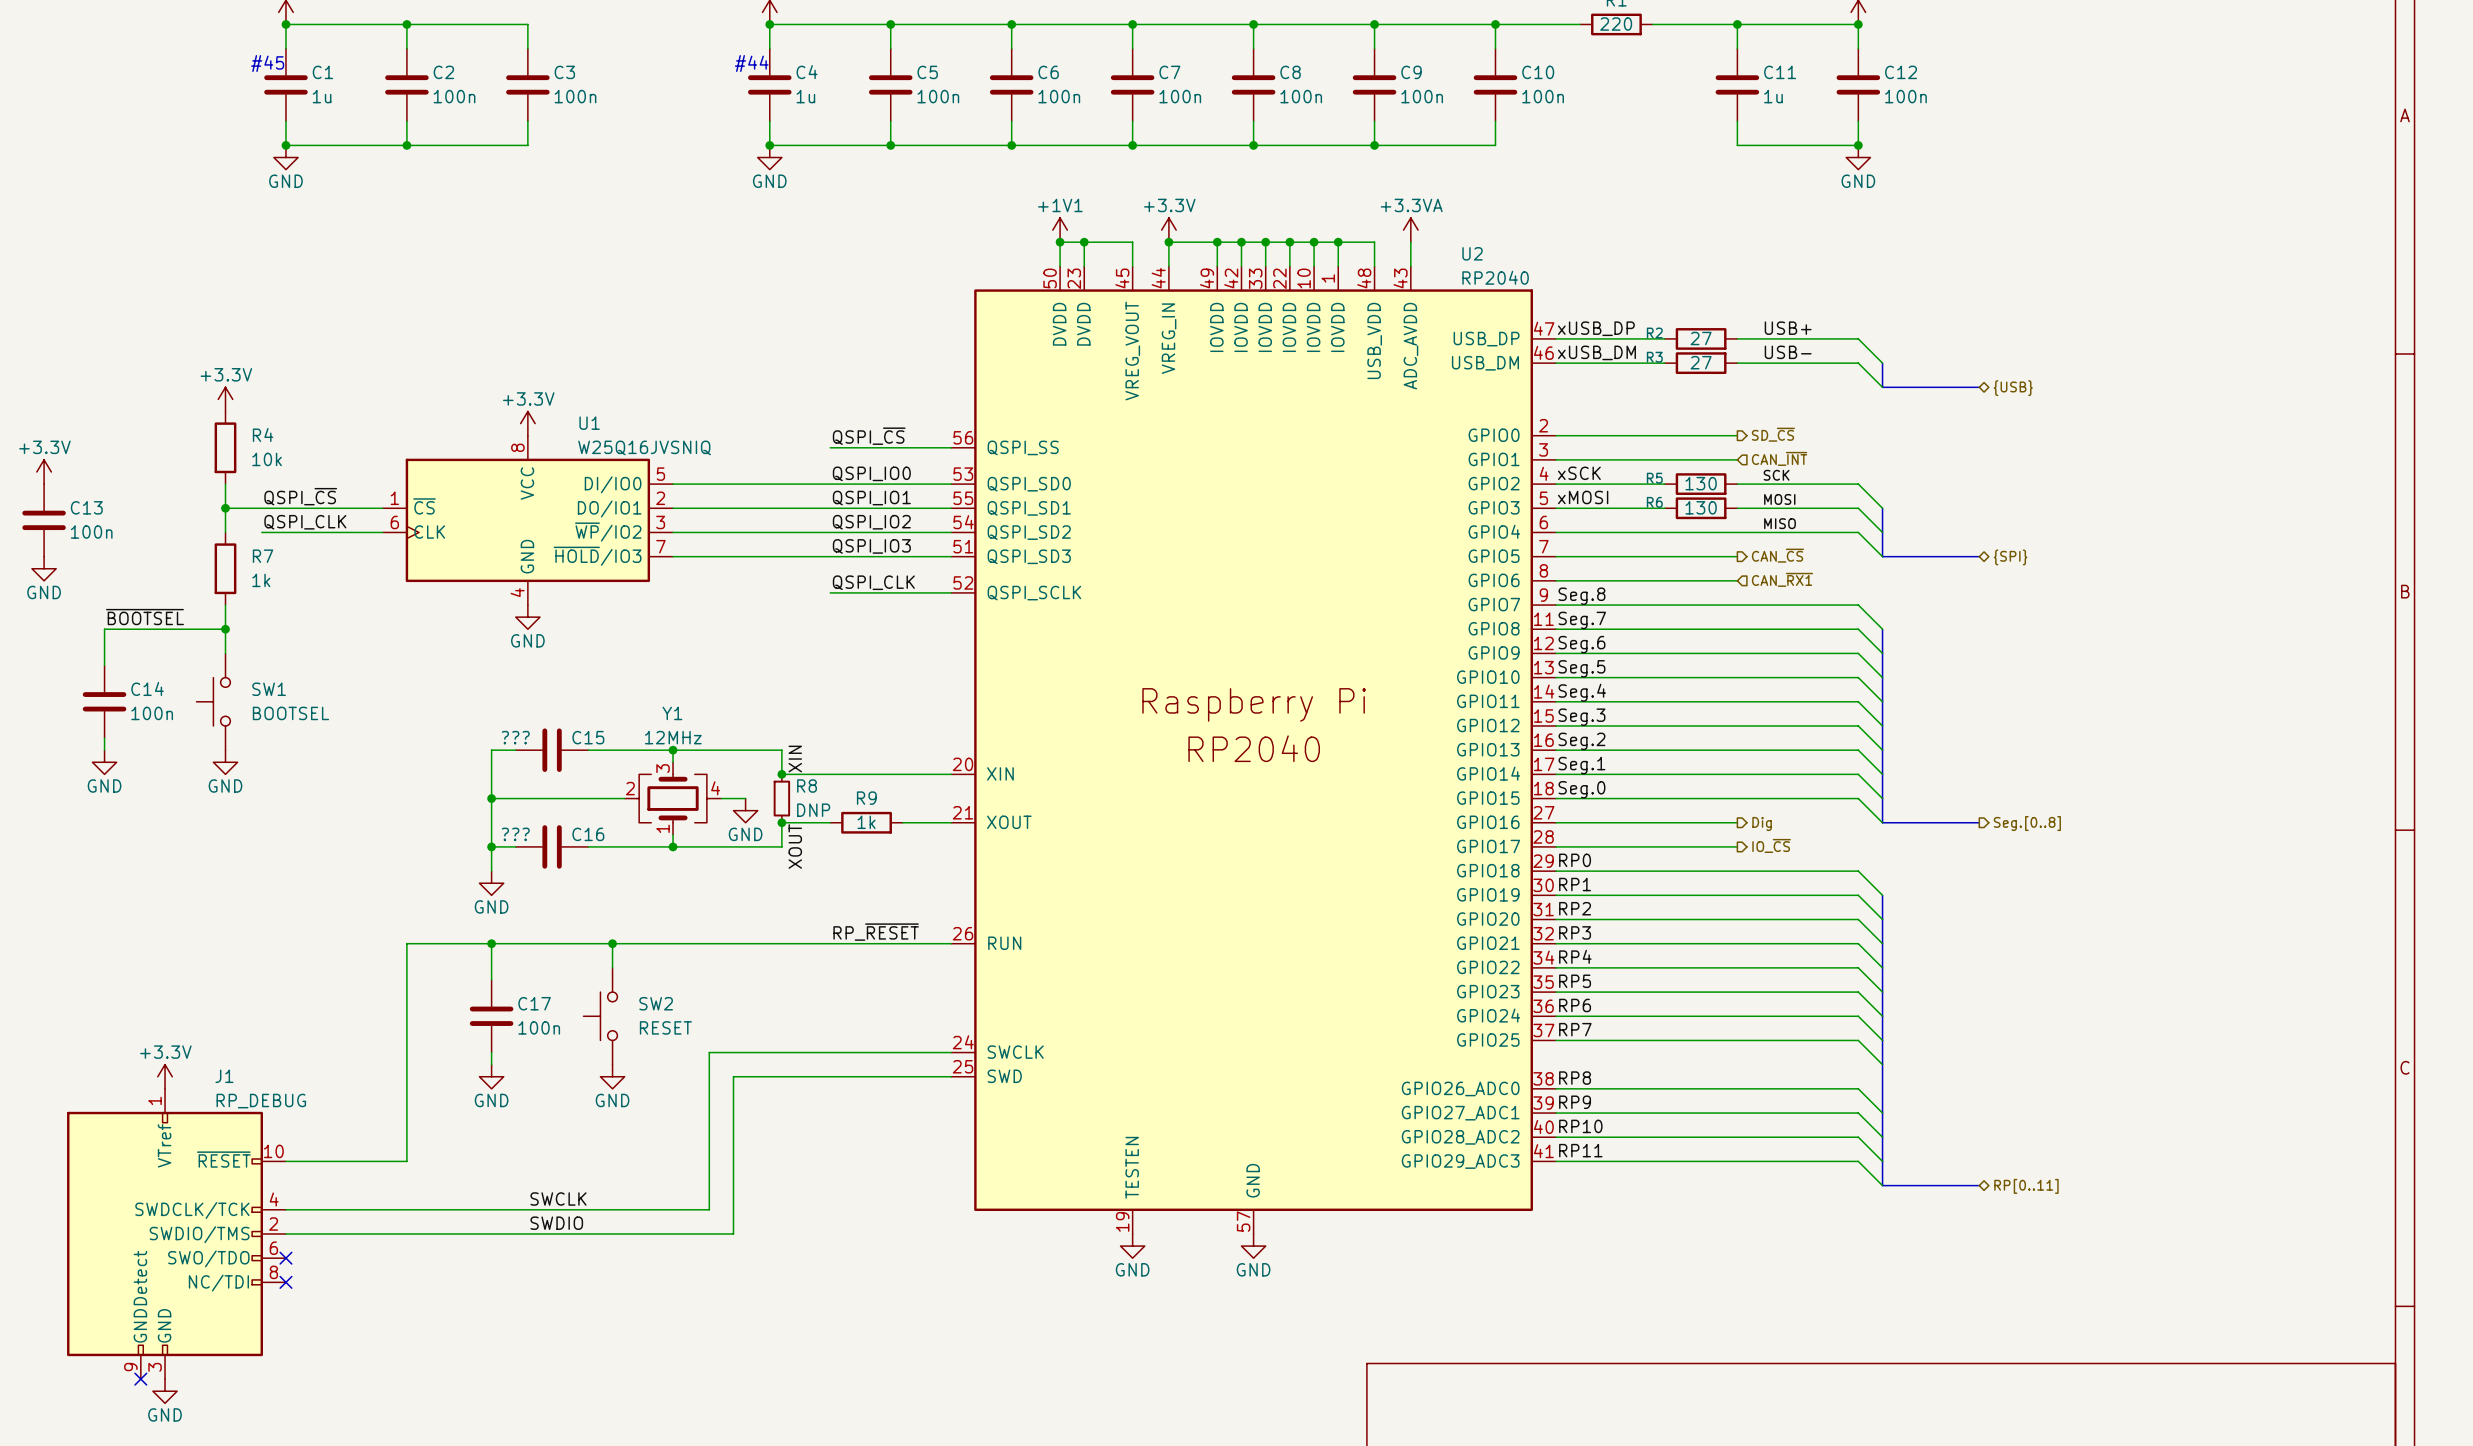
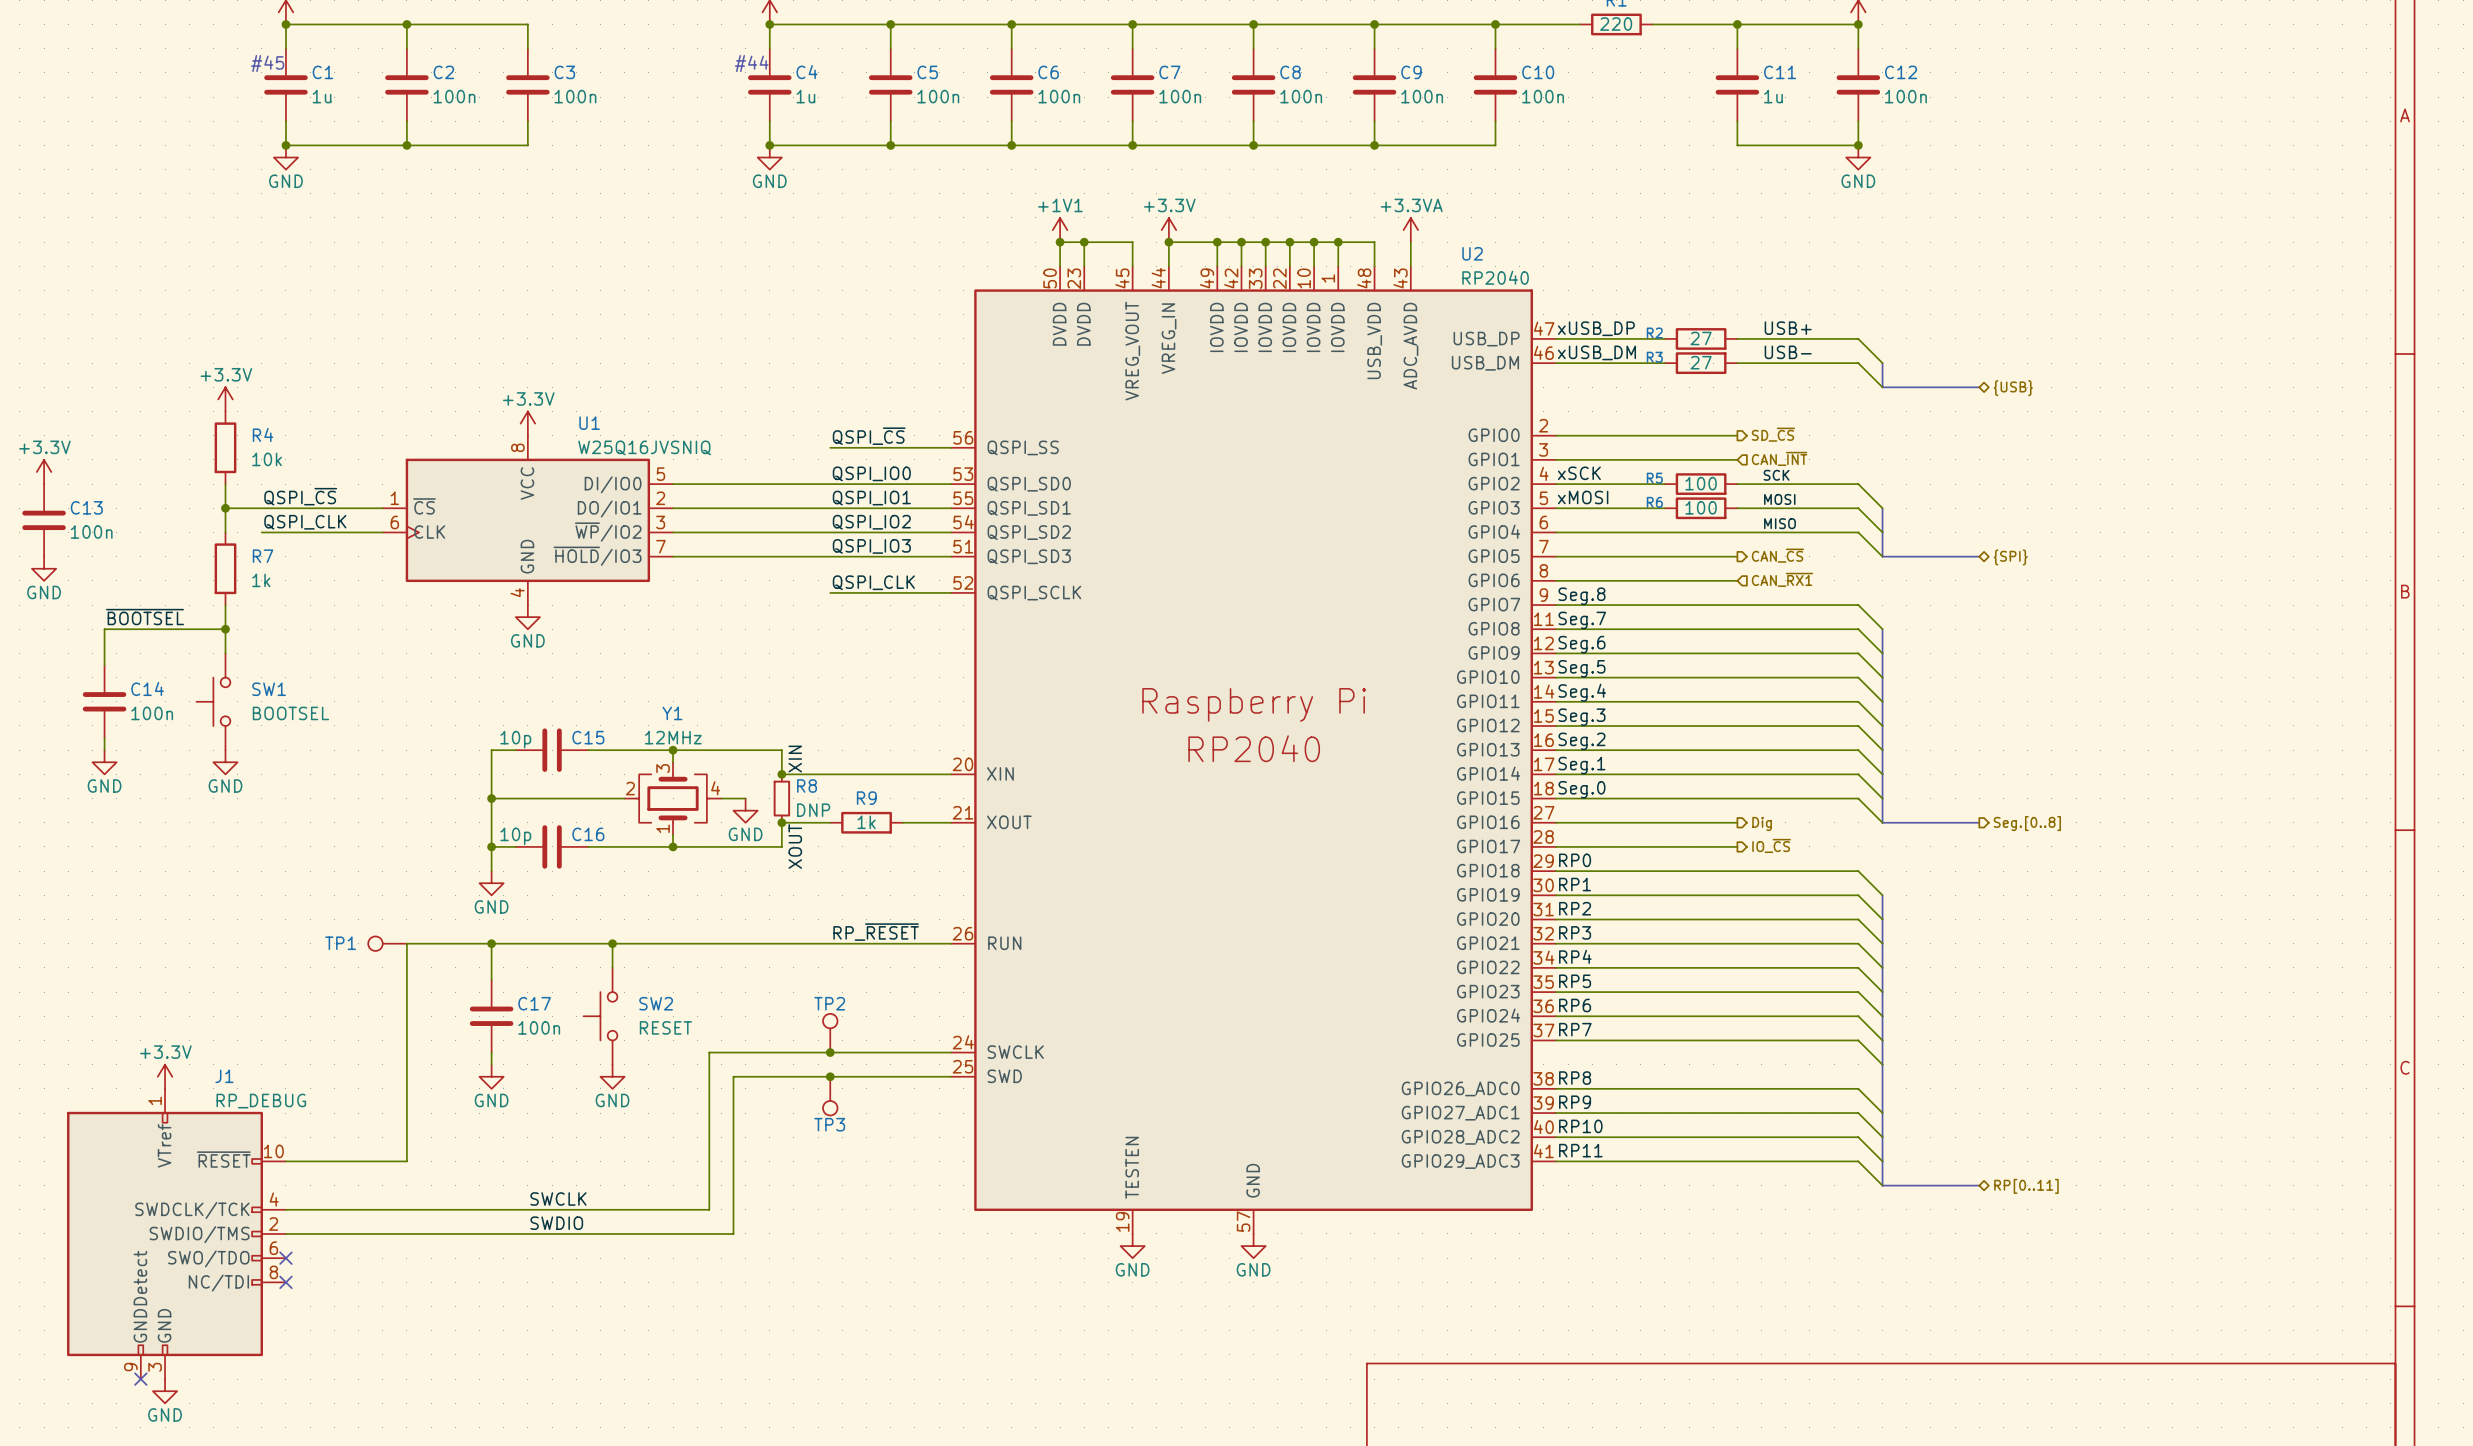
R5 value: 130 (1701, 483) -> 100 (1701, 483)
R6 value: 130 (1701, 507) -> 100 (1701, 507)
C15 value: ??? (515, 737) -> 10p (515, 739)
C16 value: ??? (515, 834) -> 10p (515, 836)
TP1: none -> (387, 943)
TP2: none -> (830, 1033)
junction: none -> (830, 1052)
junction: none -> (830, 1076)
TP3: none -> (830, 1096)

